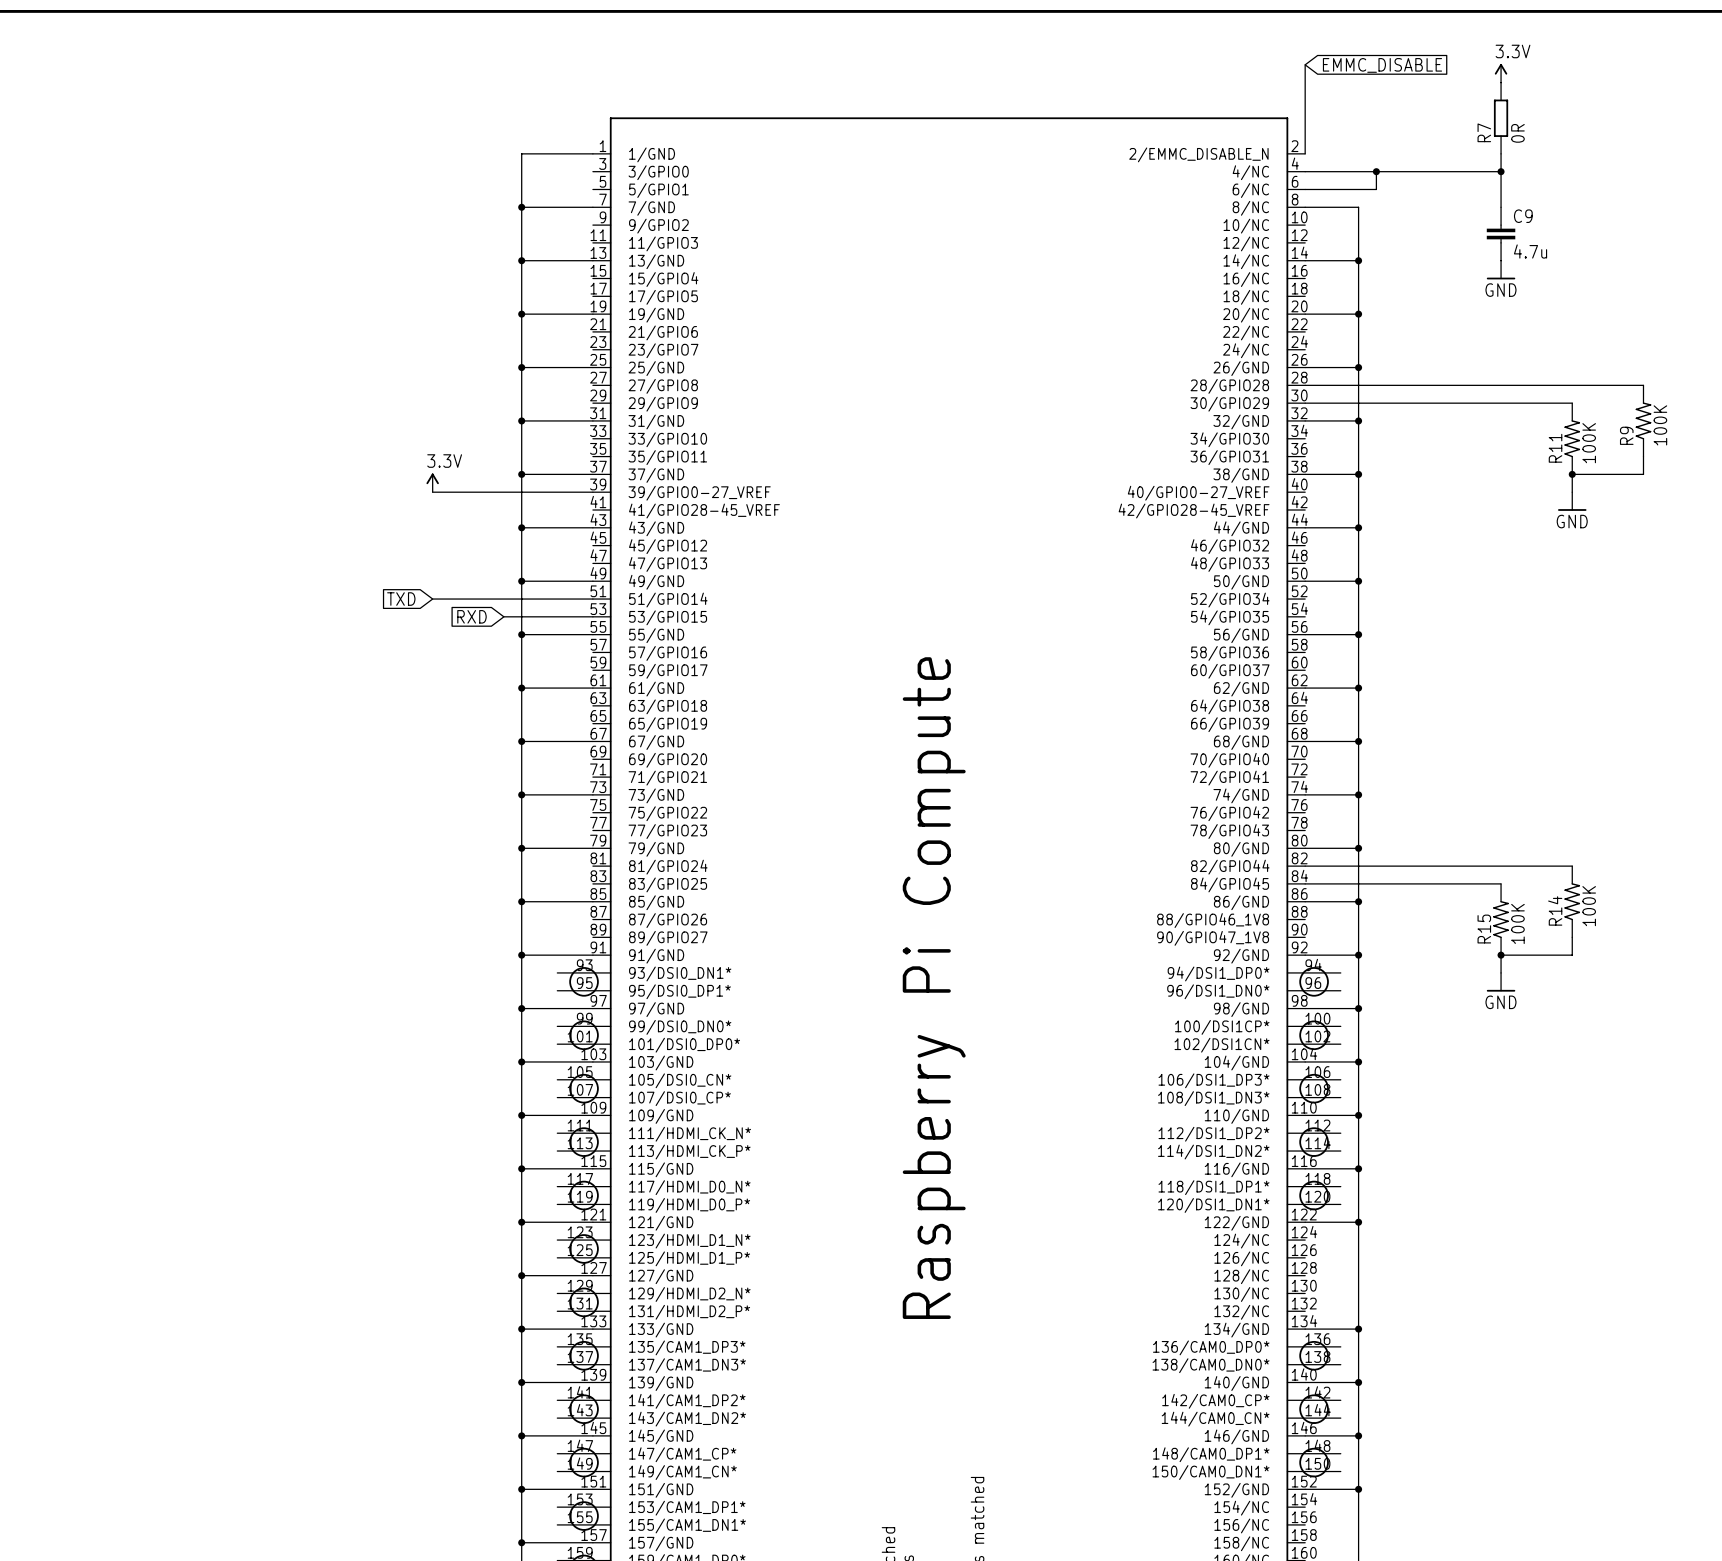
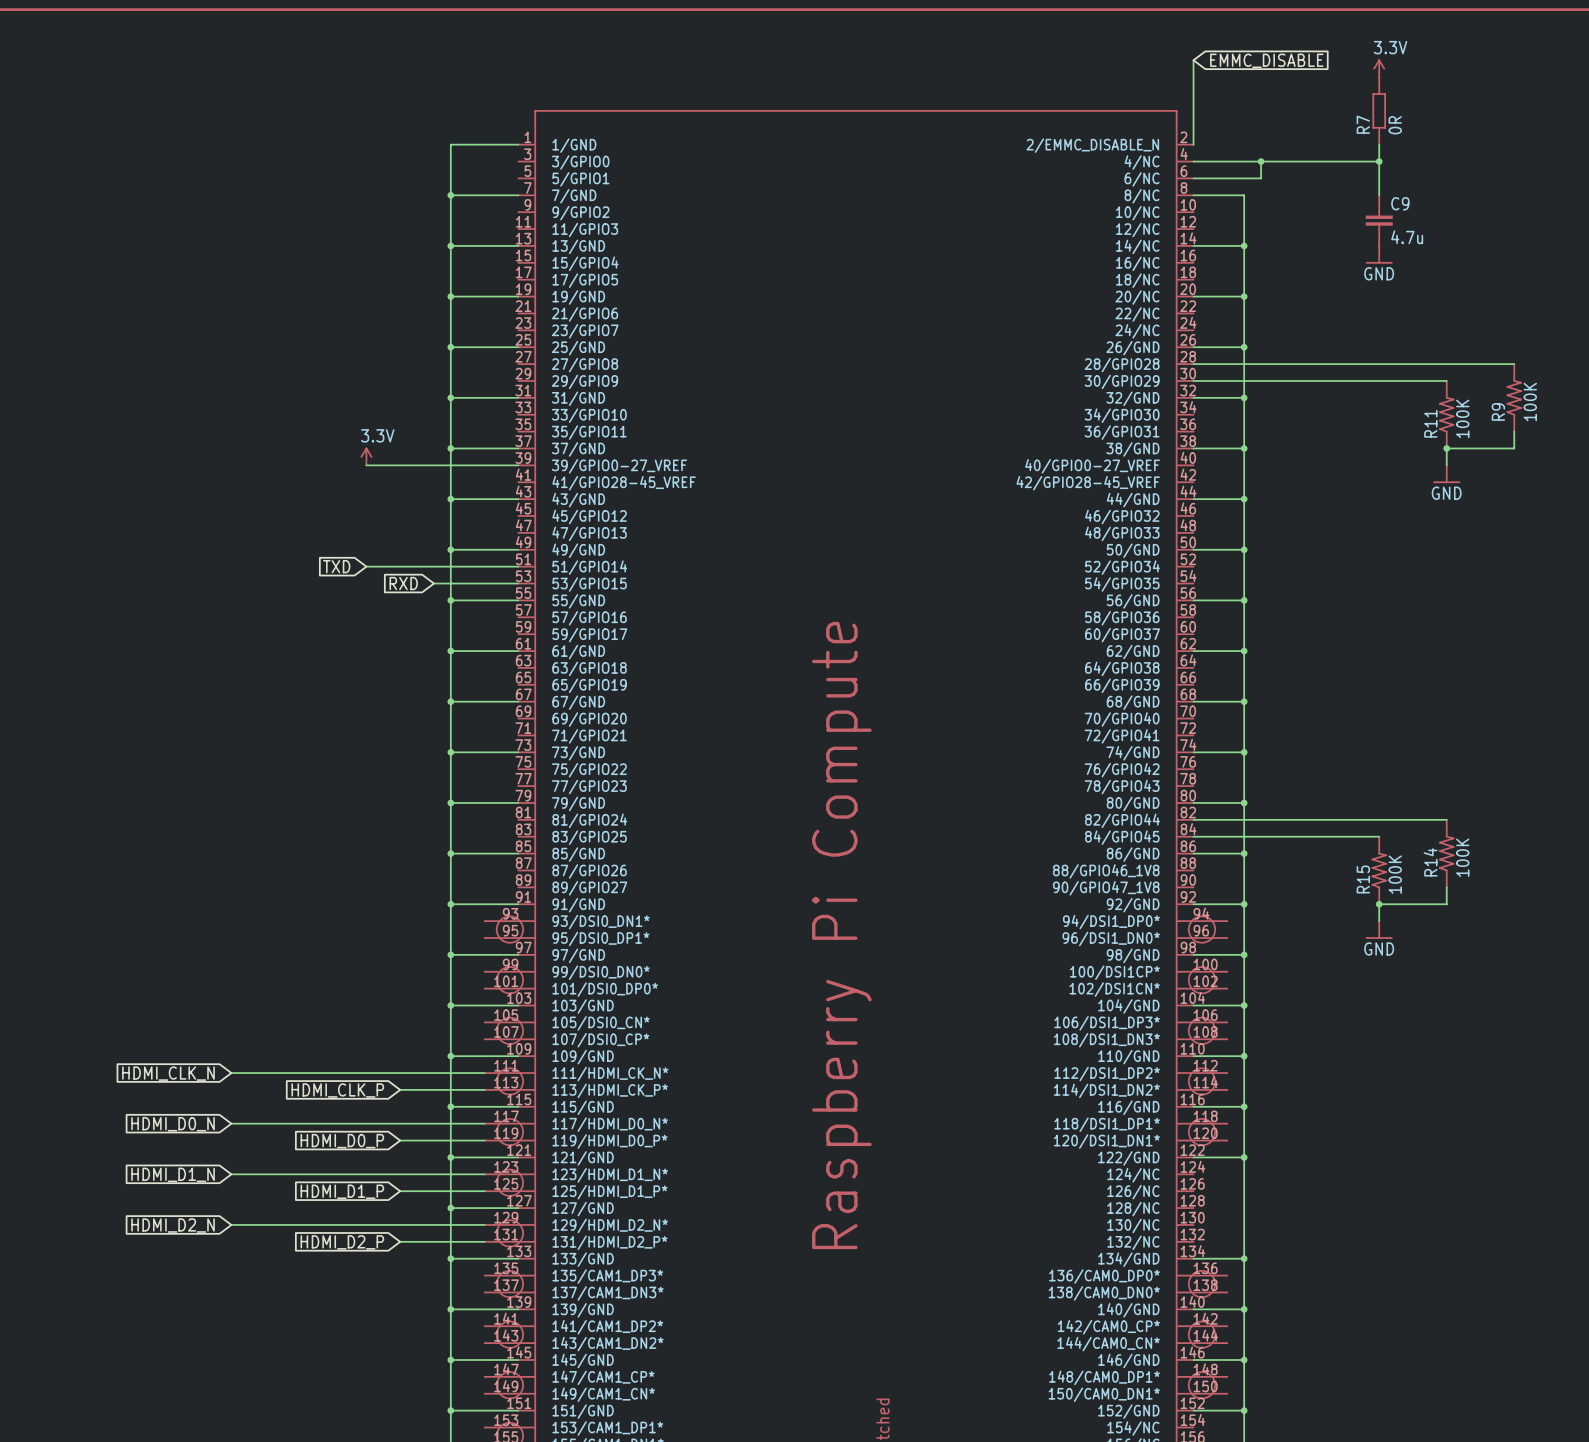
global label: none -> HDMI_CLK_N (168, 1073)
wire: none -> (231, 1073) (484, 1073)
global label: none -> HDMI_CLK_P (337, 1090)
wire: none -> (400, 1089) (484, 1089)
wire: none -> (231, 1123) (484, 1123)
global label: none -> HDMI_D0_N (173, 1124)
wire: none -> (400, 1140) (484, 1140)
global label: none -> HDMI_D0_P (342, 1141)
global label: none -> HDMI_D1_N (173, 1174)
wire: none -> (231, 1174) (484, 1174)
wire: none -> (400, 1191) (484, 1191)
global label: none -> HDMI_D1_P (342, 1191)
wire: none -> (231, 1224) (484, 1224)
global label: none -> HDMI_D2_N (173, 1225)
global label: none -> HDMI_D2_P (342, 1242)
wire: none -> (400, 1241) (484, 1241)

